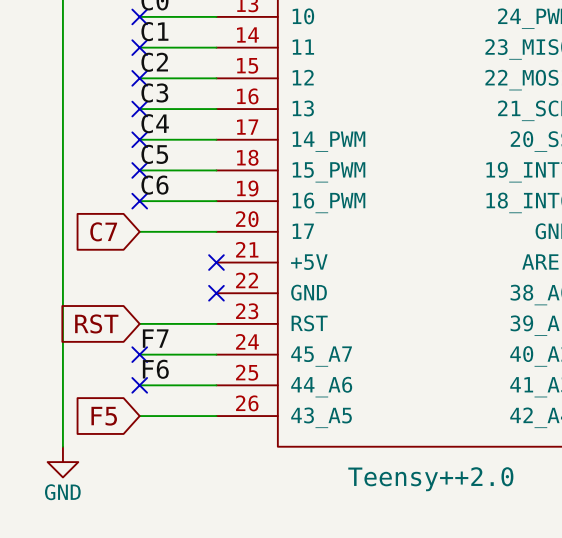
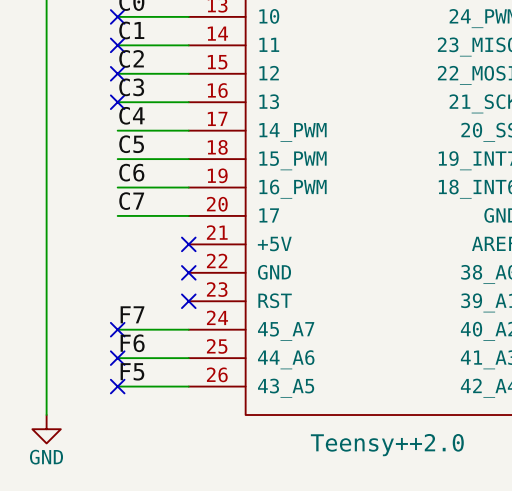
no-connect mark: (139, 139) -> none
no-connect mark: (139, 170) -> none
no-connect mark: (139, 201) -> none
label: none -> C7 (131, 201)
global label: C7 (103, 231) -> none
global label: RST (96, 323) -> none
wire: (139, 323) (216, 323) -> none
no-connect mark: none -> (188, 301)
label: none -> F5 (132, 371)
global label: F5 (104, 416) -> none
no-connect mark: none -> (117, 386)

